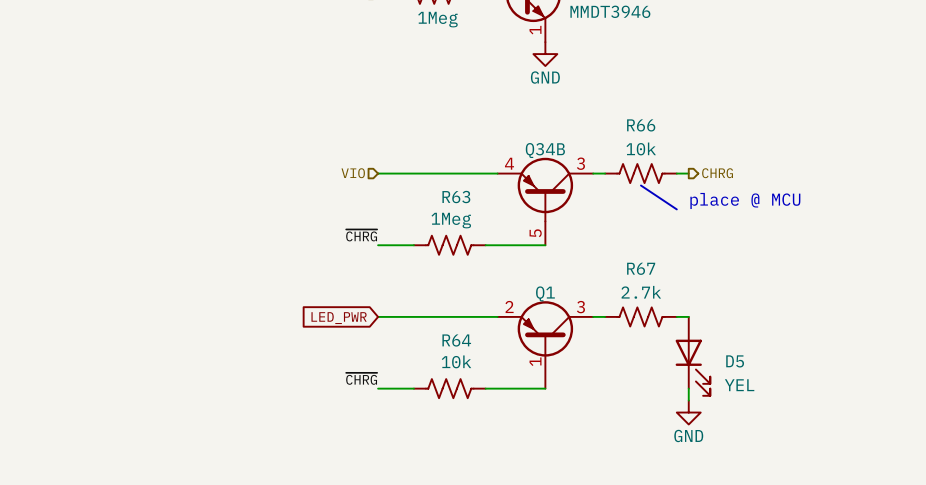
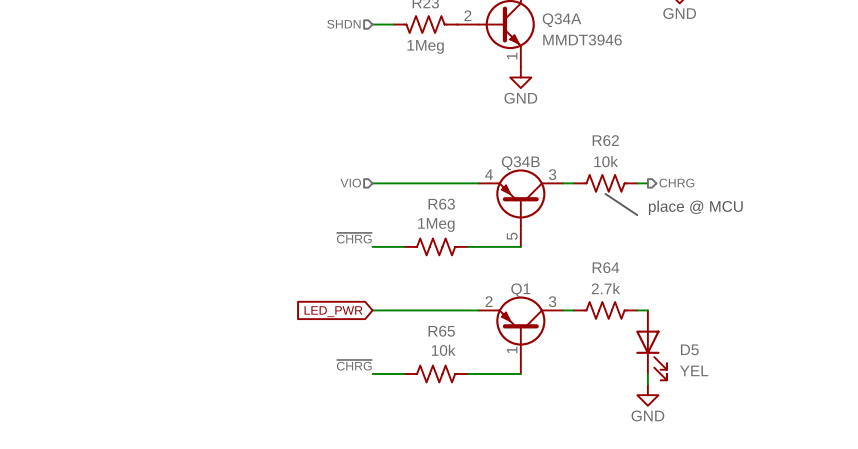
R66 name: R66 (641, 125) -> R62 (605, 140)
R67 name: R67 (641, 268) -> R64 (605, 267)
R64 name: R64 (456, 340) -> R65 (441, 331)

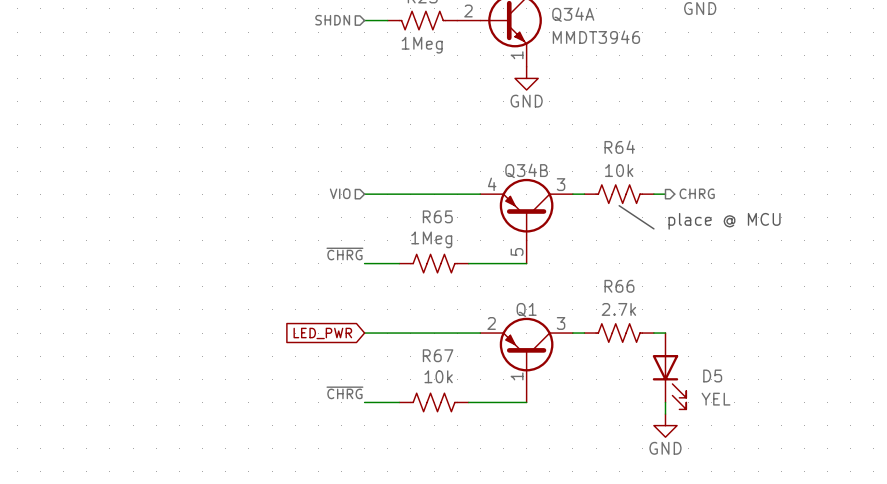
R62 name: R62 (605, 140) -> R64 (619, 147)
R63 name: R63 (441, 204) -> R65 (437, 216)
R64 name: R64 (605, 267) -> R66 (619, 286)
R65 name: R65 (441, 331) -> R67 (438, 355)

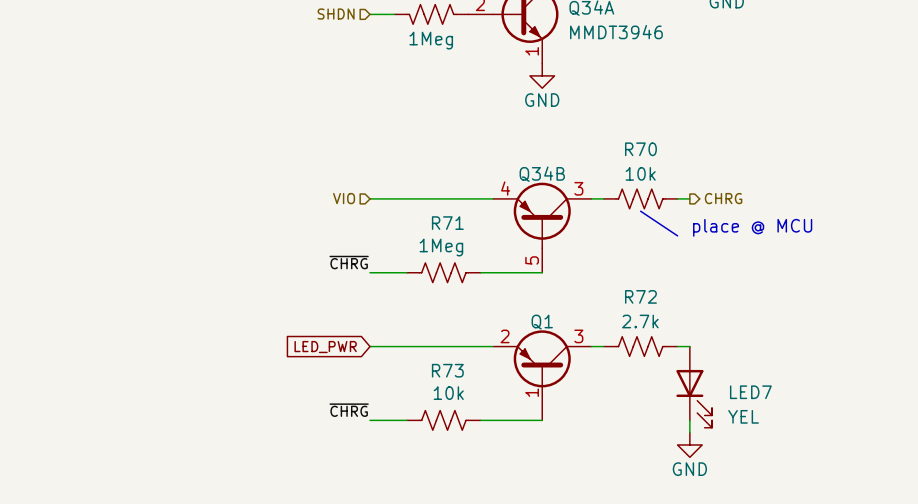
R64 name: R64 (619, 147) -> R70 (640, 149)
R65 name: R65 (437, 216) -> R71 (447, 223)
R66 name: R66 (619, 286) -> R72 (640, 296)
R67 name: R67 (438, 355) -> R73 (447, 370)
D5 name: D5 (712, 375) -> LED7 (750, 392)

